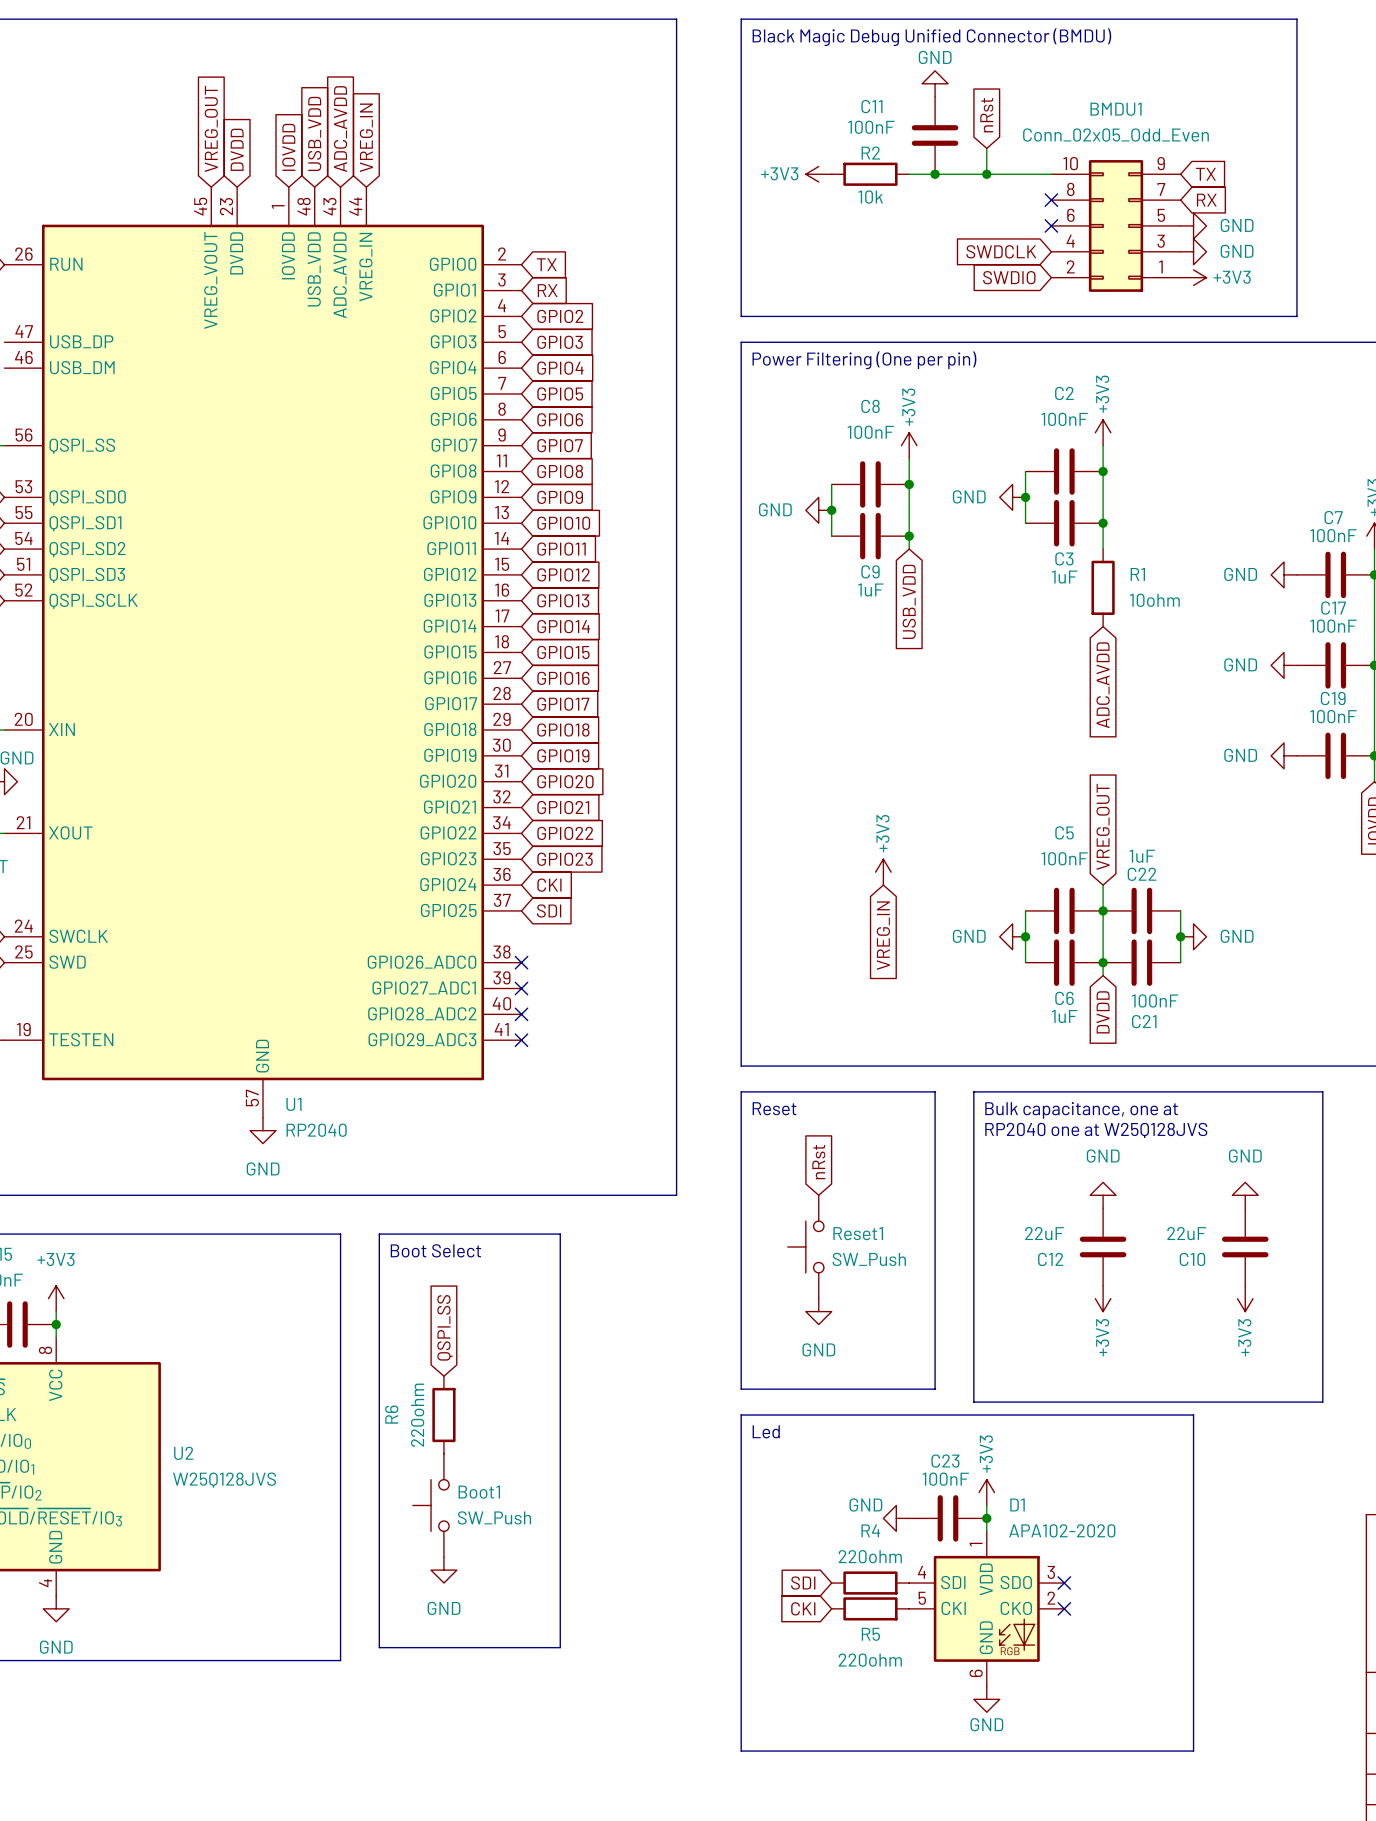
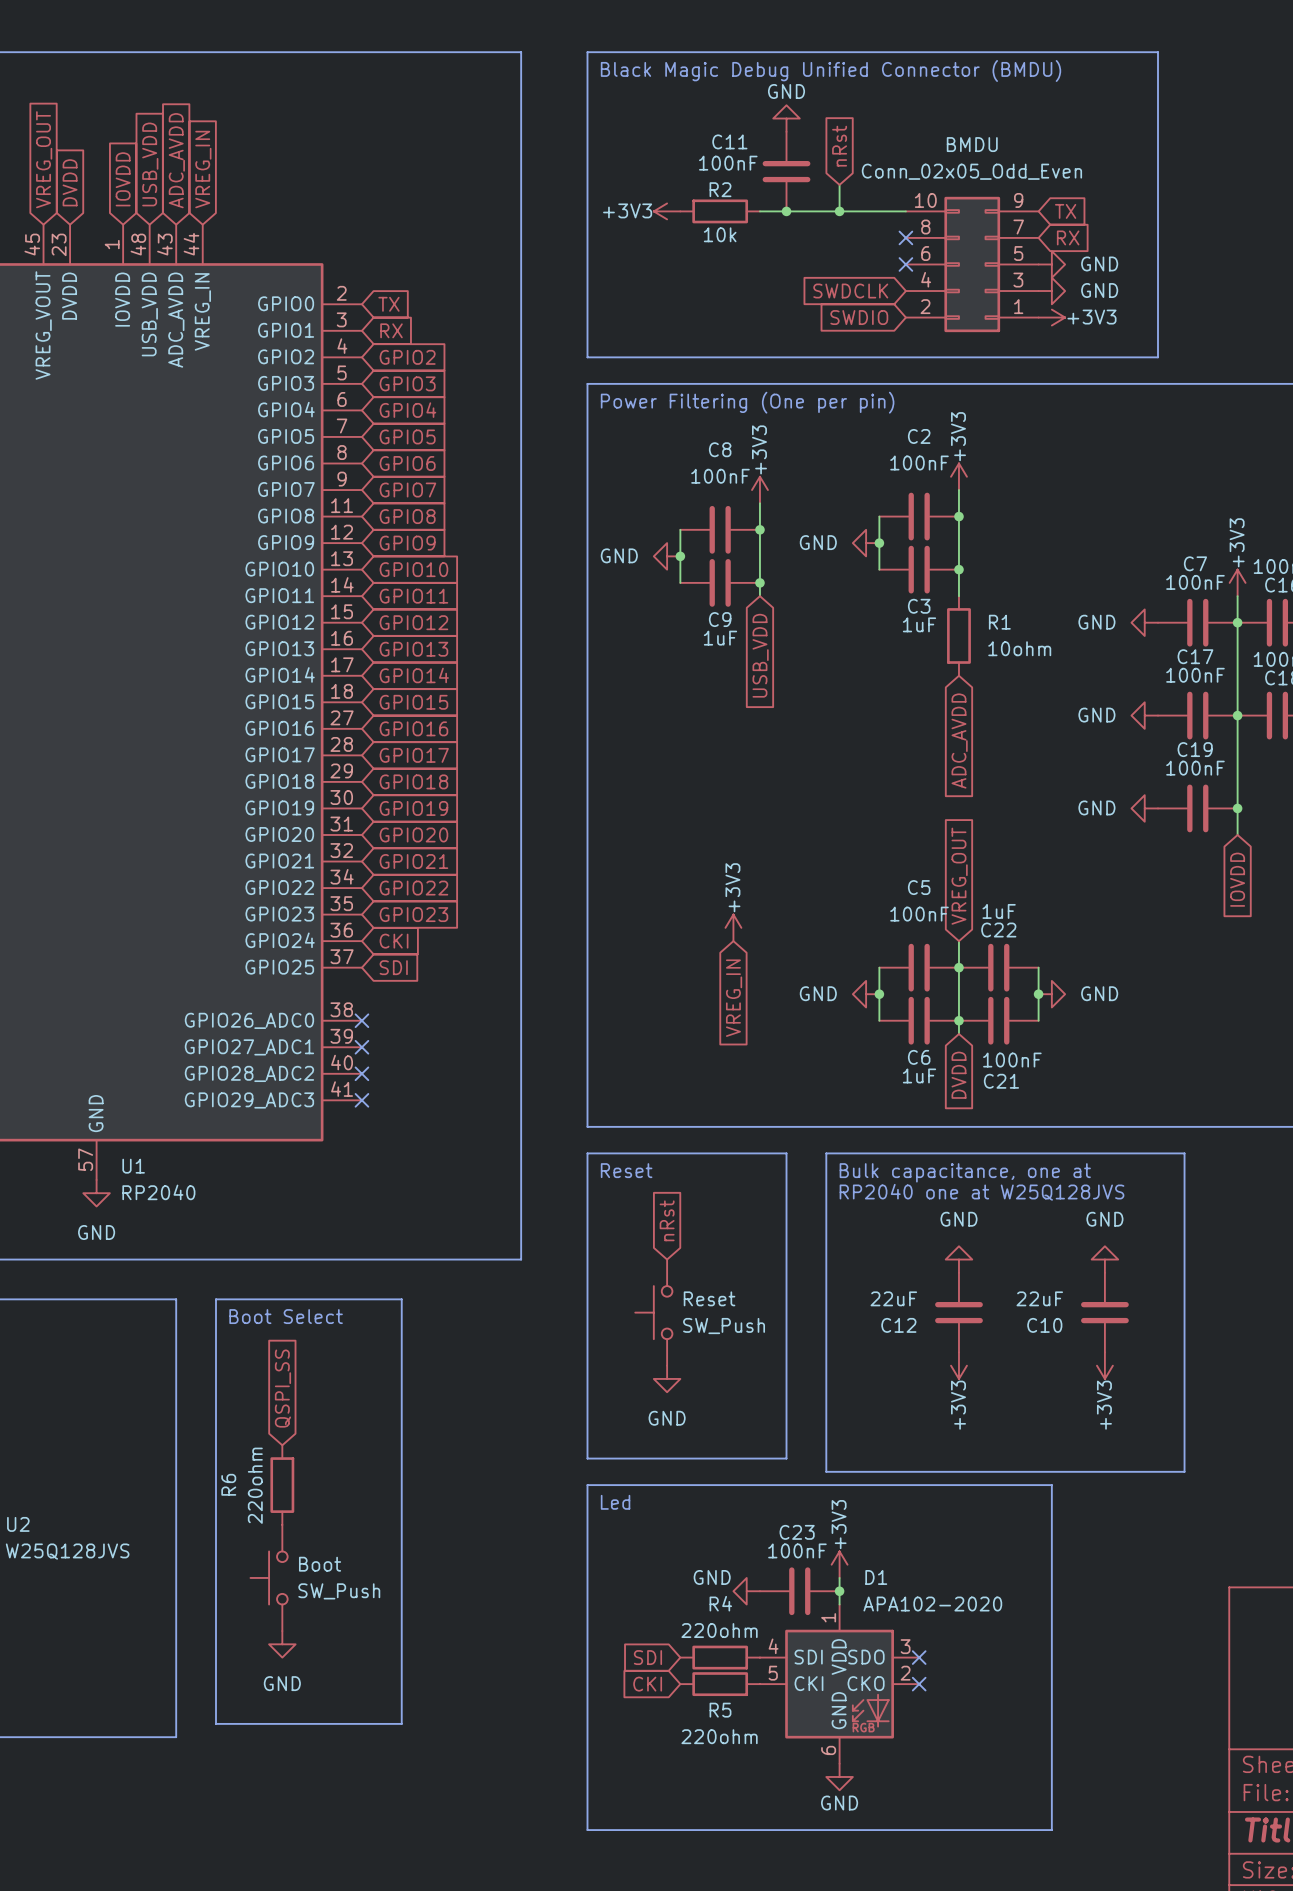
BMDU1 name: BMDU1 (1116, 109) -> BMDU (972, 144)
Reset1 name: Reset1 (858, 1233) -> Reset (709, 1298)
Boot1 name: Boot1 (479, 1492) -> Boot (320, 1564)

